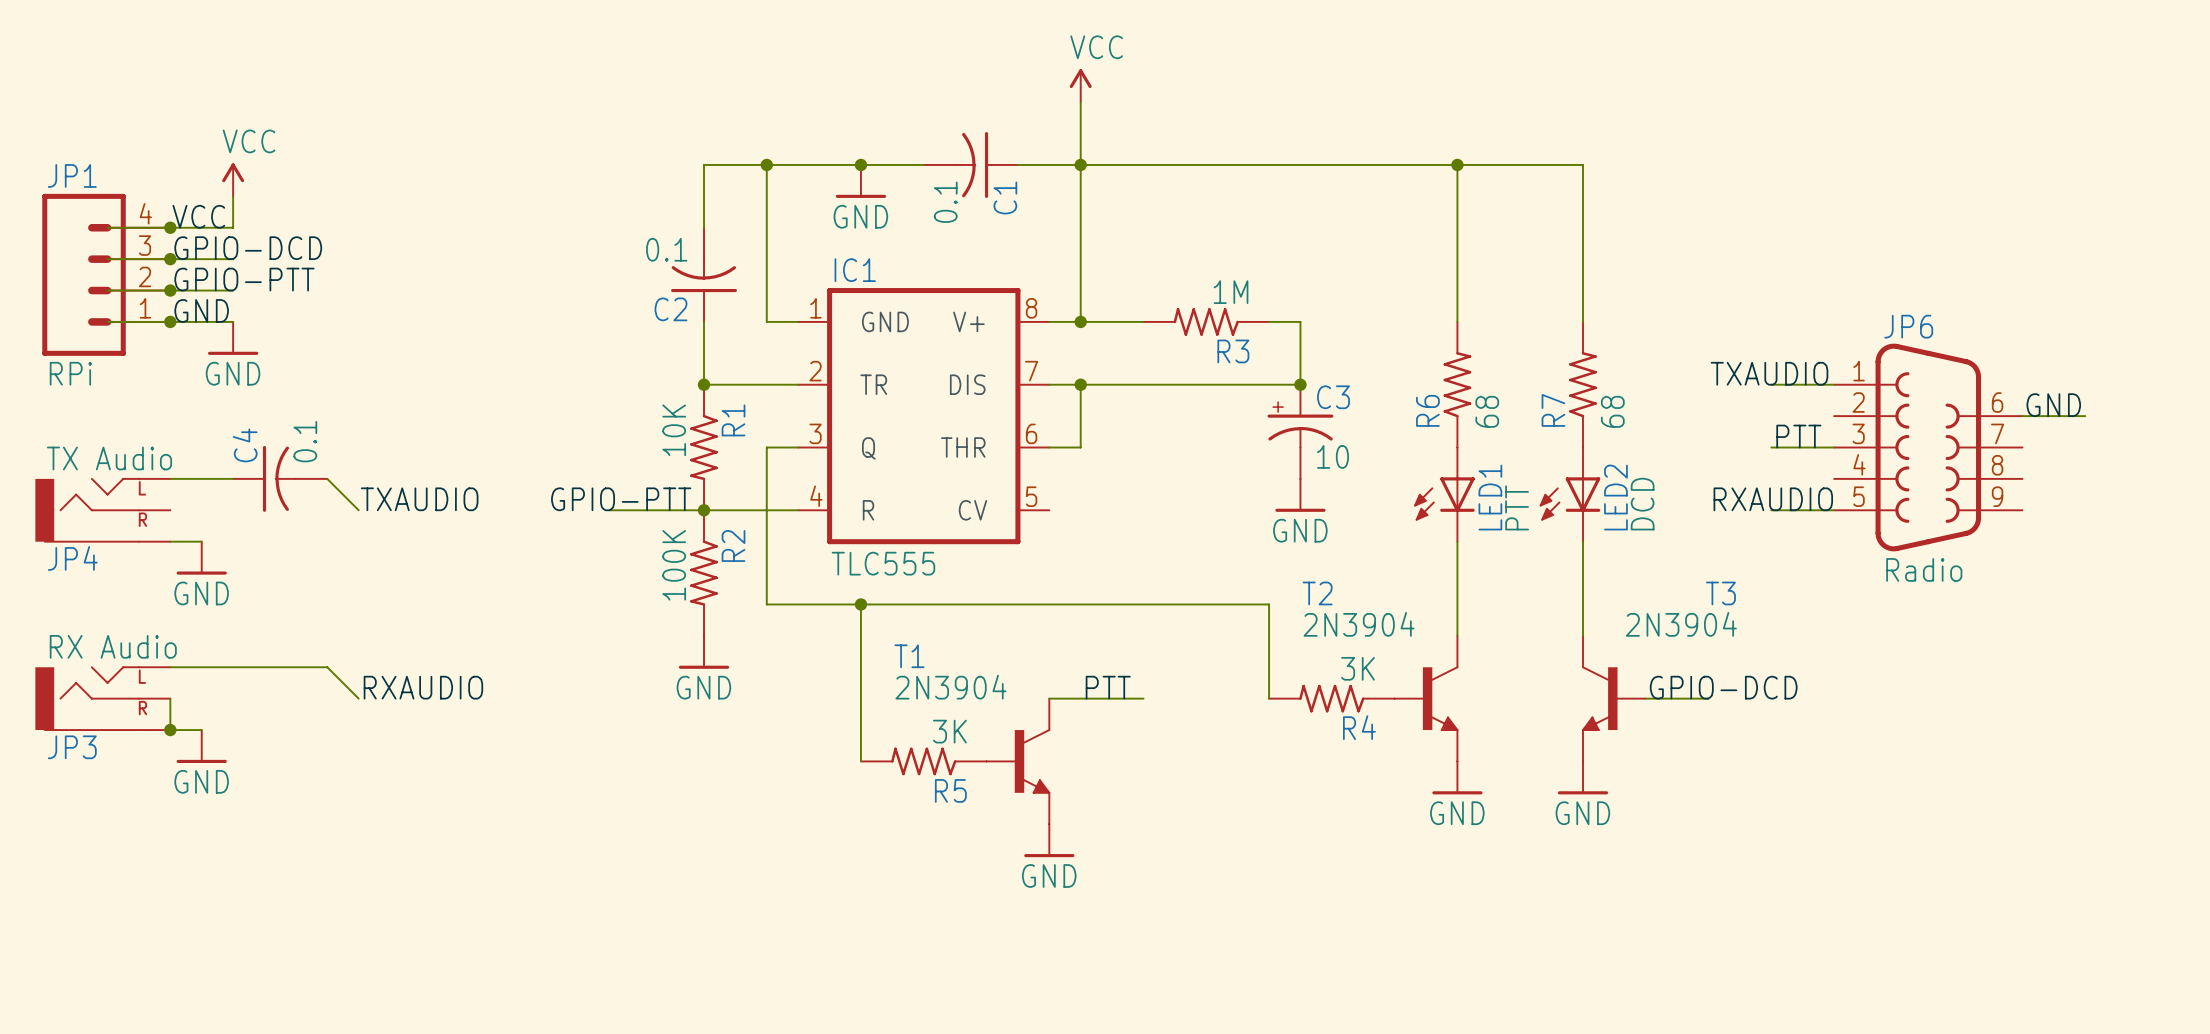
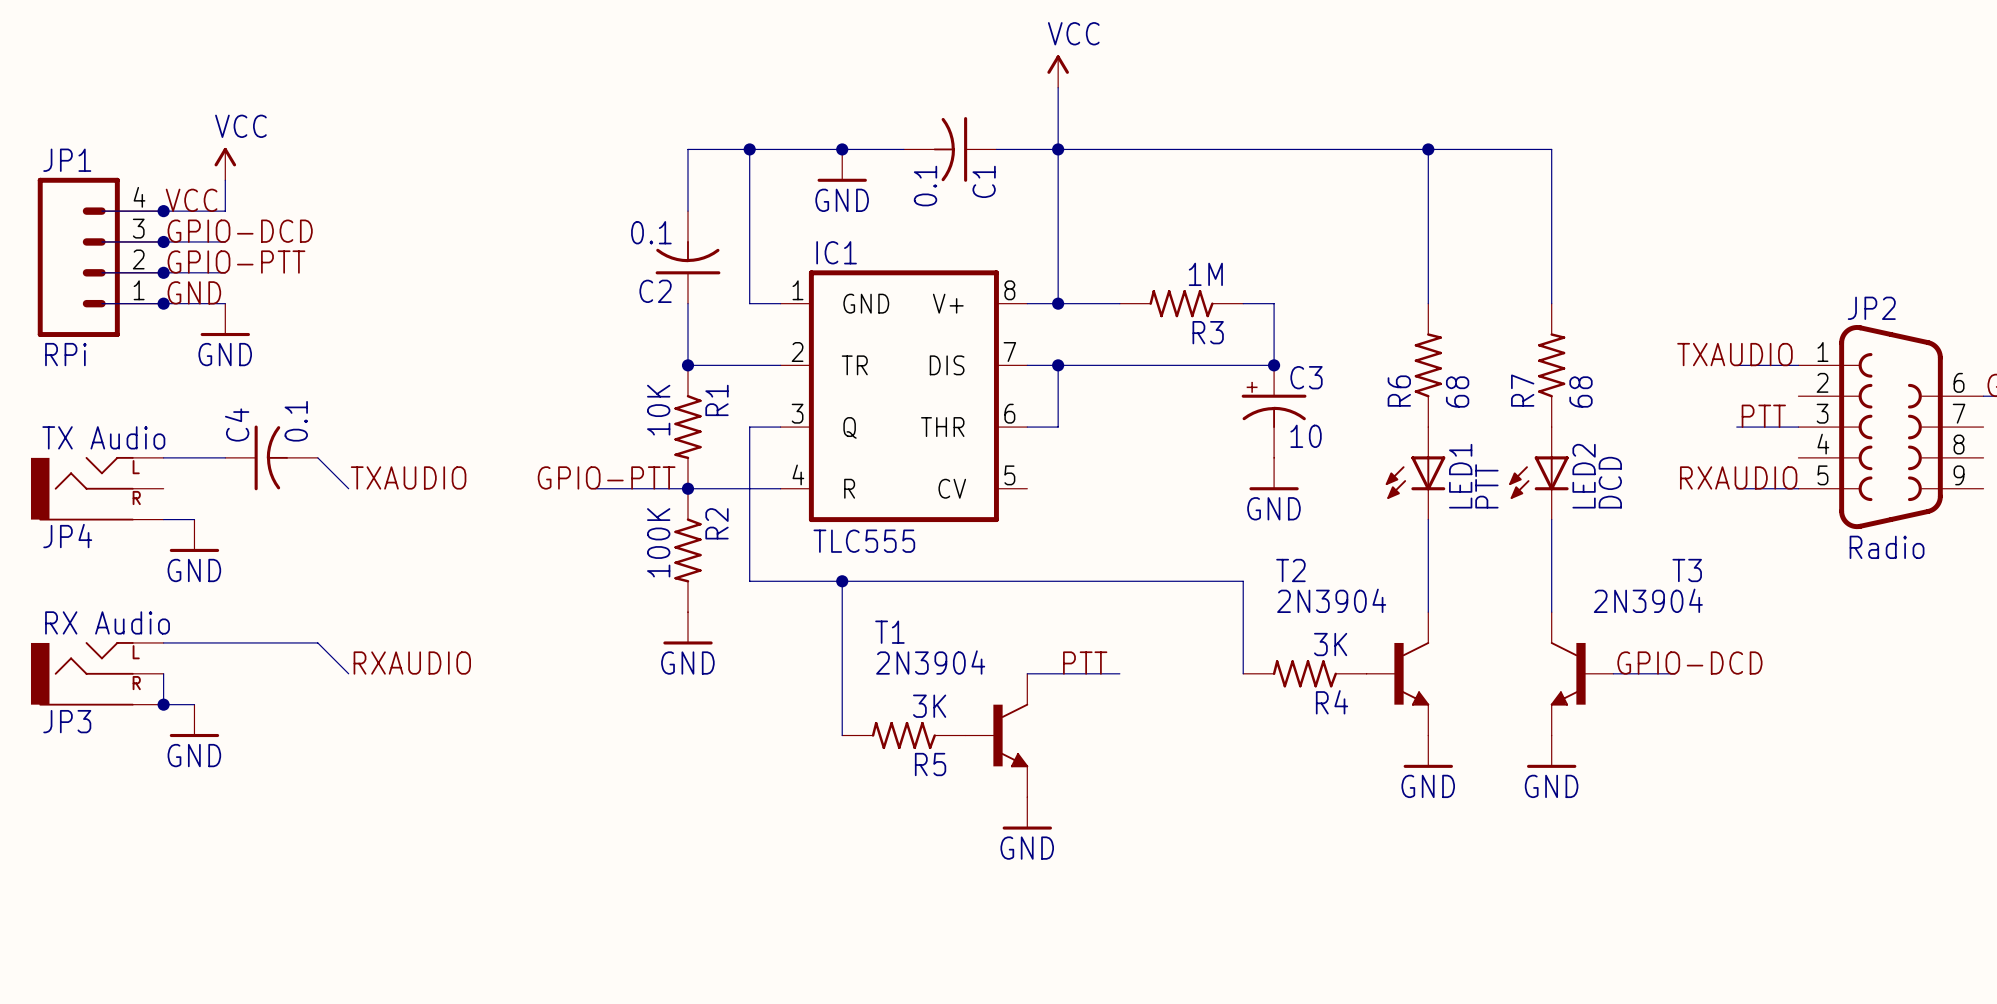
JP6 name: JP6 (1908, 326) -> JP2 (1871, 308)

